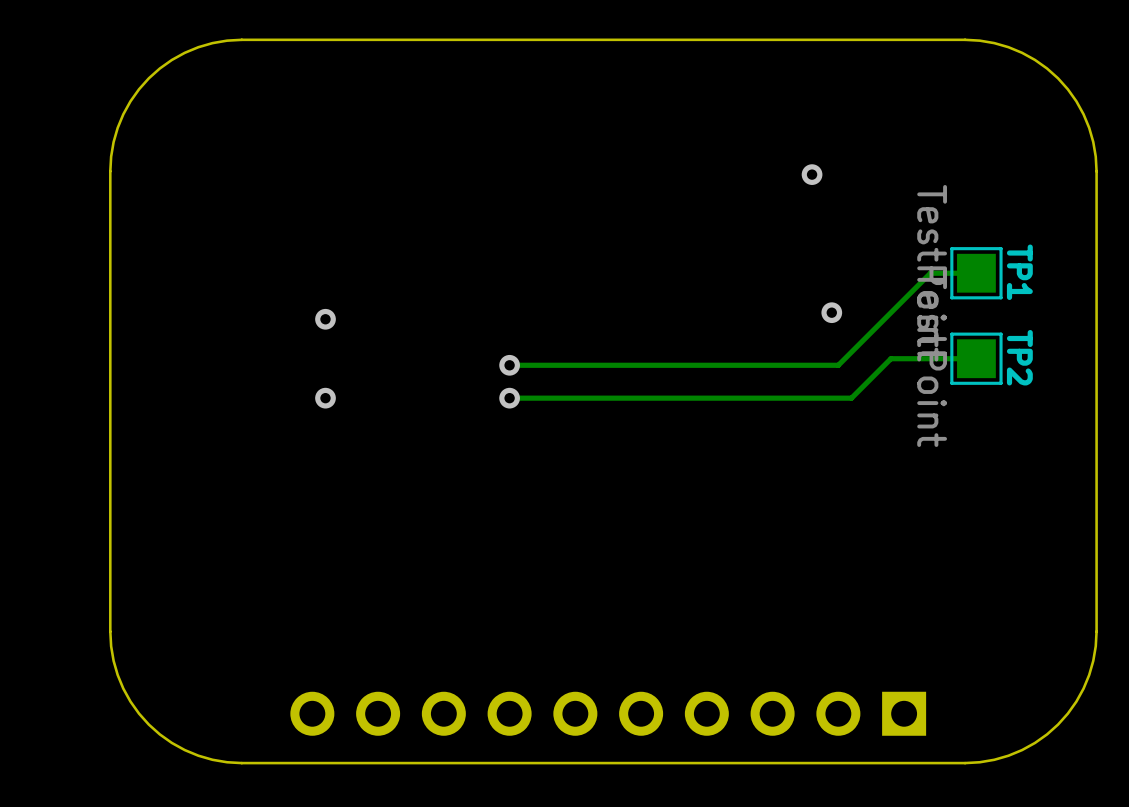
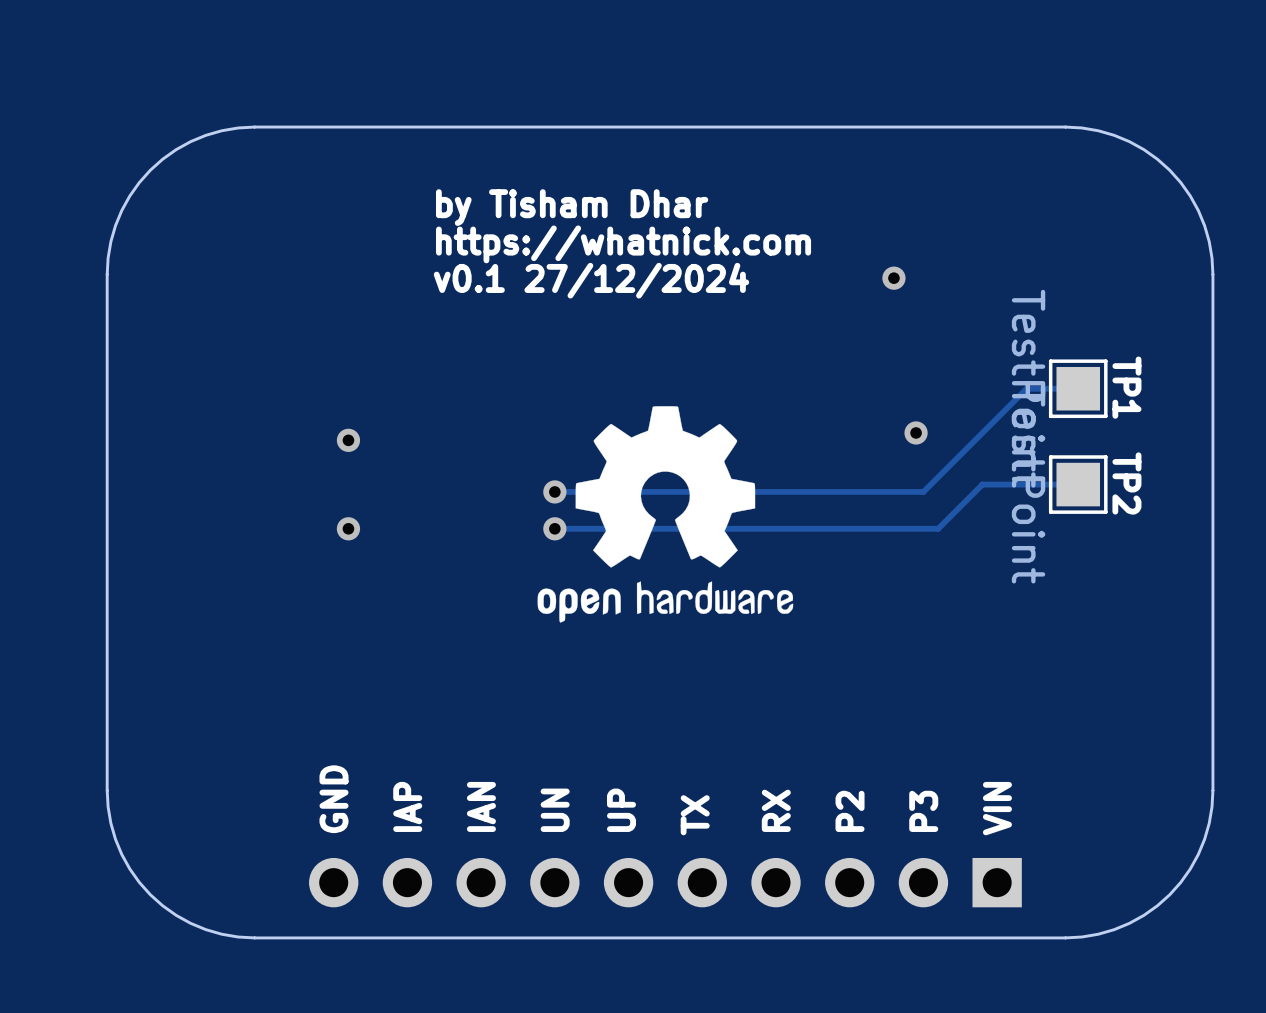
text: none -> by Tisham Dhar (572, 207)
text: none -> https://whatnick.com (623, 244)
text: none -> v0.1 27/12/2024 (591, 280)
drawing: none -> [537, 406, 794, 623]
text: none -> GND (334, 799)
text: none -> IAP (407, 806)
text: none -> IAN (481, 806)
text: none -> VIN (997, 808)
text: none -> UN (555, 810)
text: none -> UP (621, 810)
text: none -> RX (776, 810)
text: none -> P2 (850, 811)
text: none -> P3 (923, 811)
text: none -> TX (695, 815)

